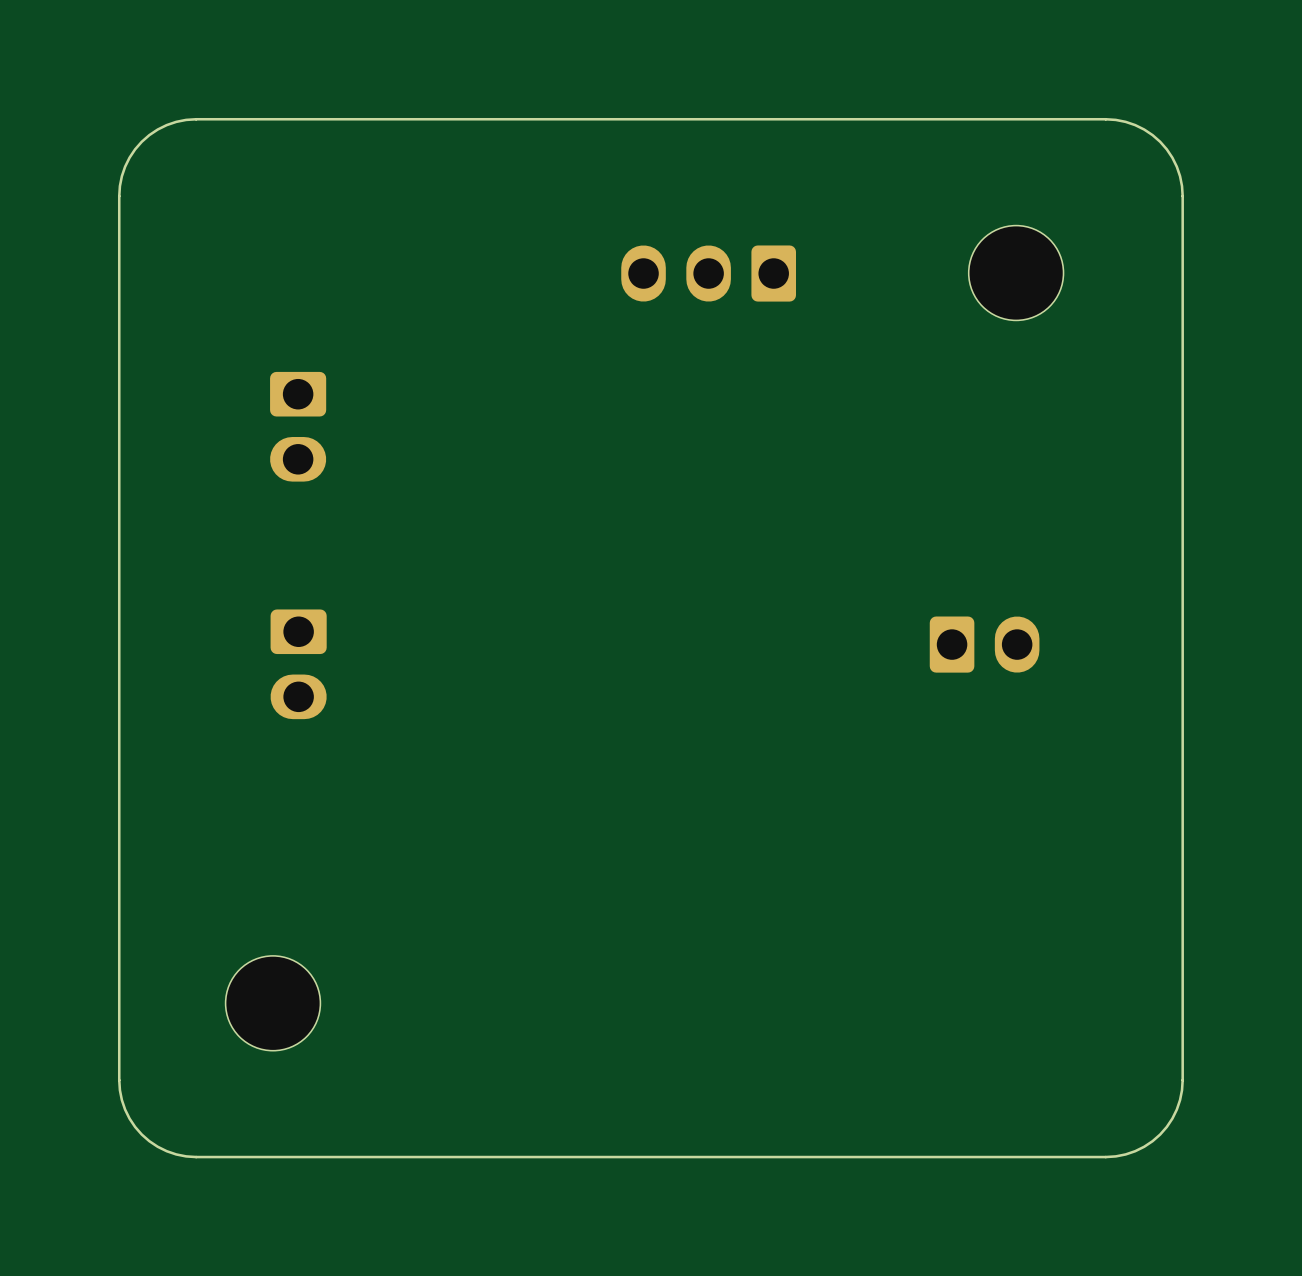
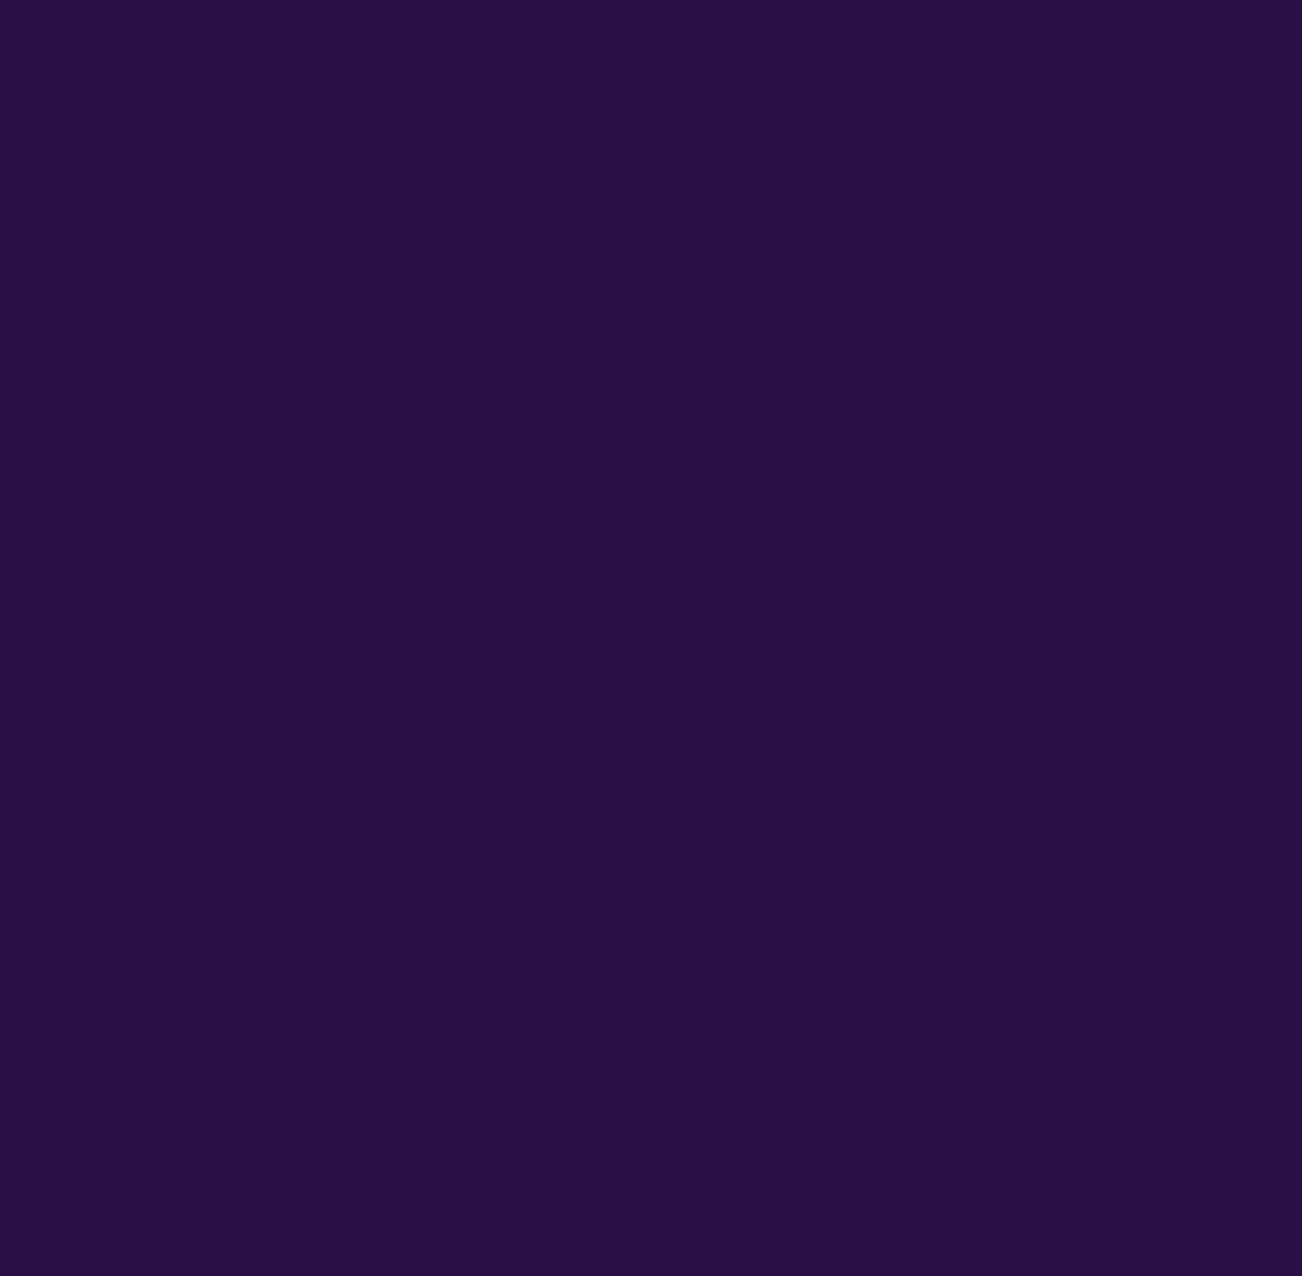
board edge: (1105, 119) (196, 119) (166, 125) (141, 141) (125, 166) (119, 196) (119, 1080) (125, 1109) (141, 1134) (166, 1151) (196, 1157) (1105, 1157) (1135, 1151) (1160, 1134) (1176, 1109) (1182, 1080) (1182, 196) (1176, 166) (1160, 141) (1135, 125) (1105, 119) -> none
part: (708, 273) -> none
part: (1016, 273) -> none
part: (298, 426) -> none
part: (984, 644) -> none
part: (298, 664) -> none
part: (273, 1003) -> none

